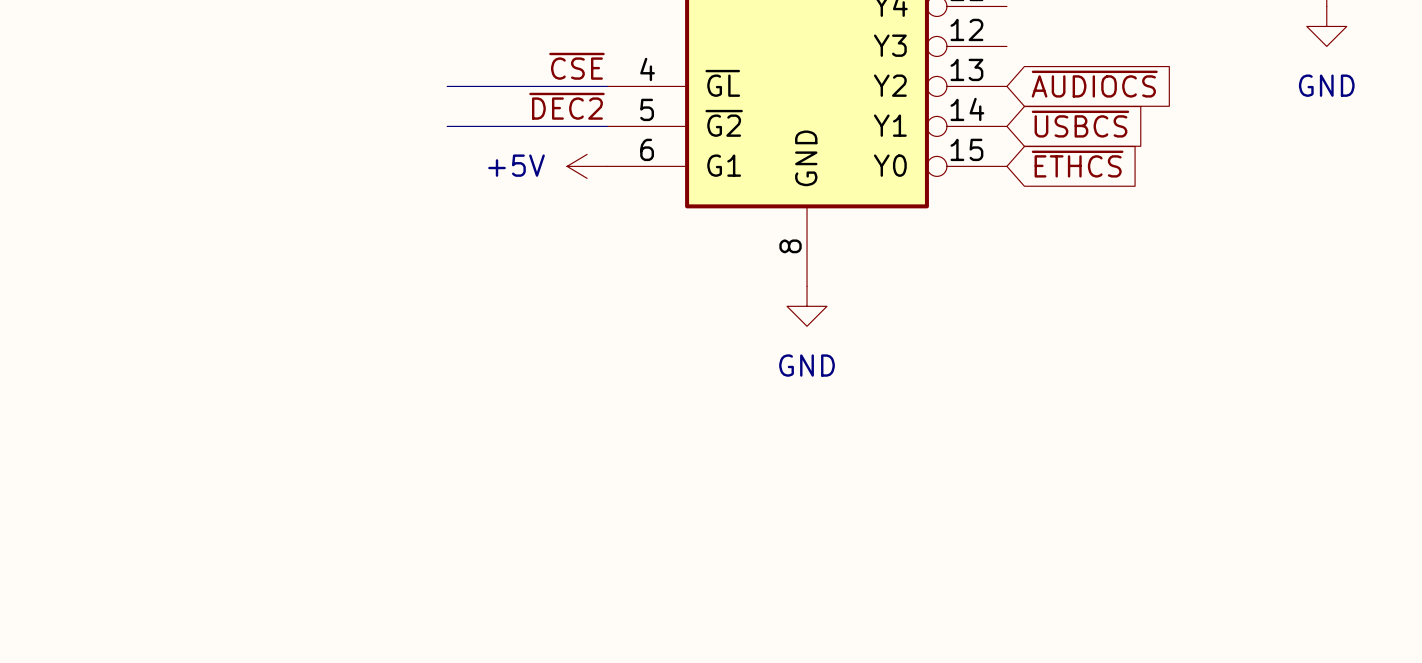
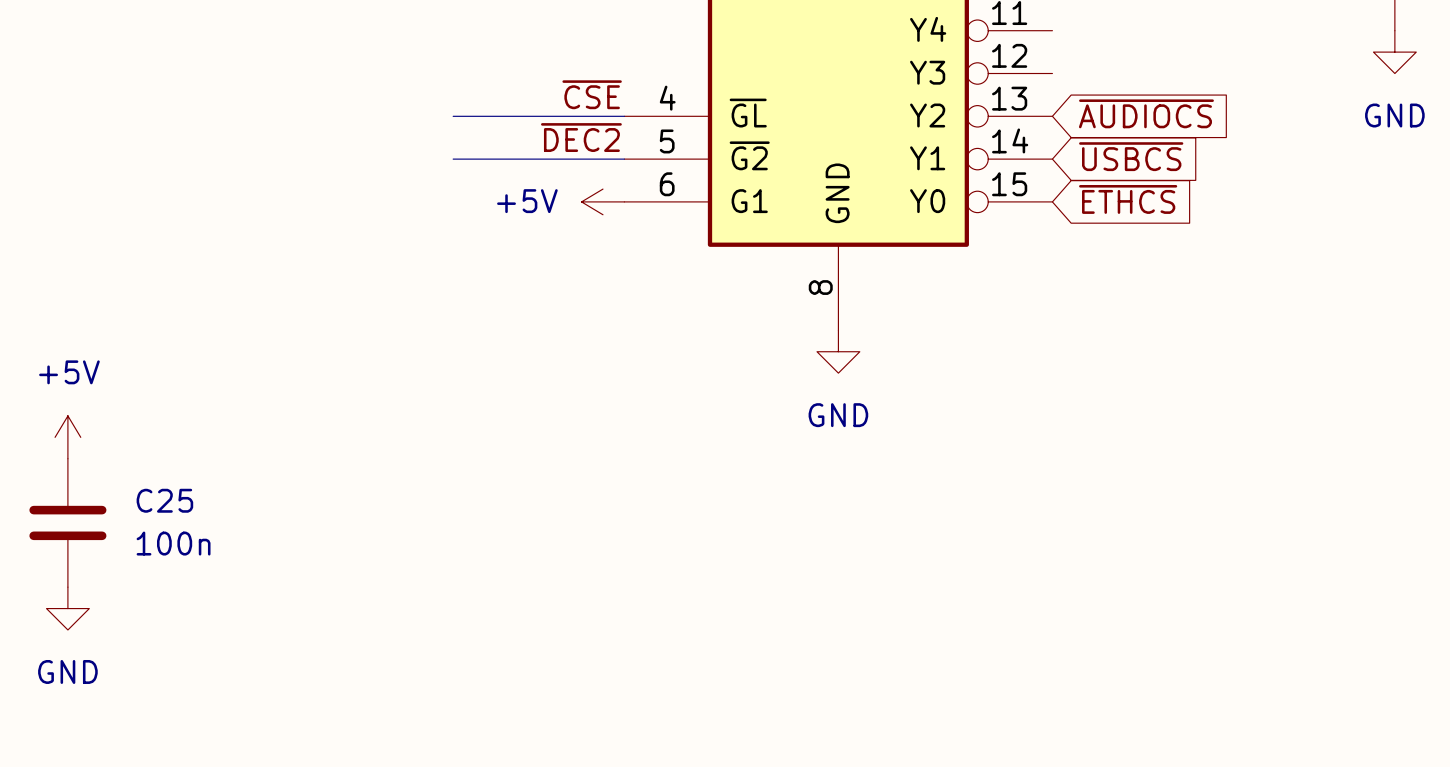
power symbol: none -> +5V (67, 437)
C25: none -> 100n (67, 522)
power symbol: none -> GND (67, 608)

